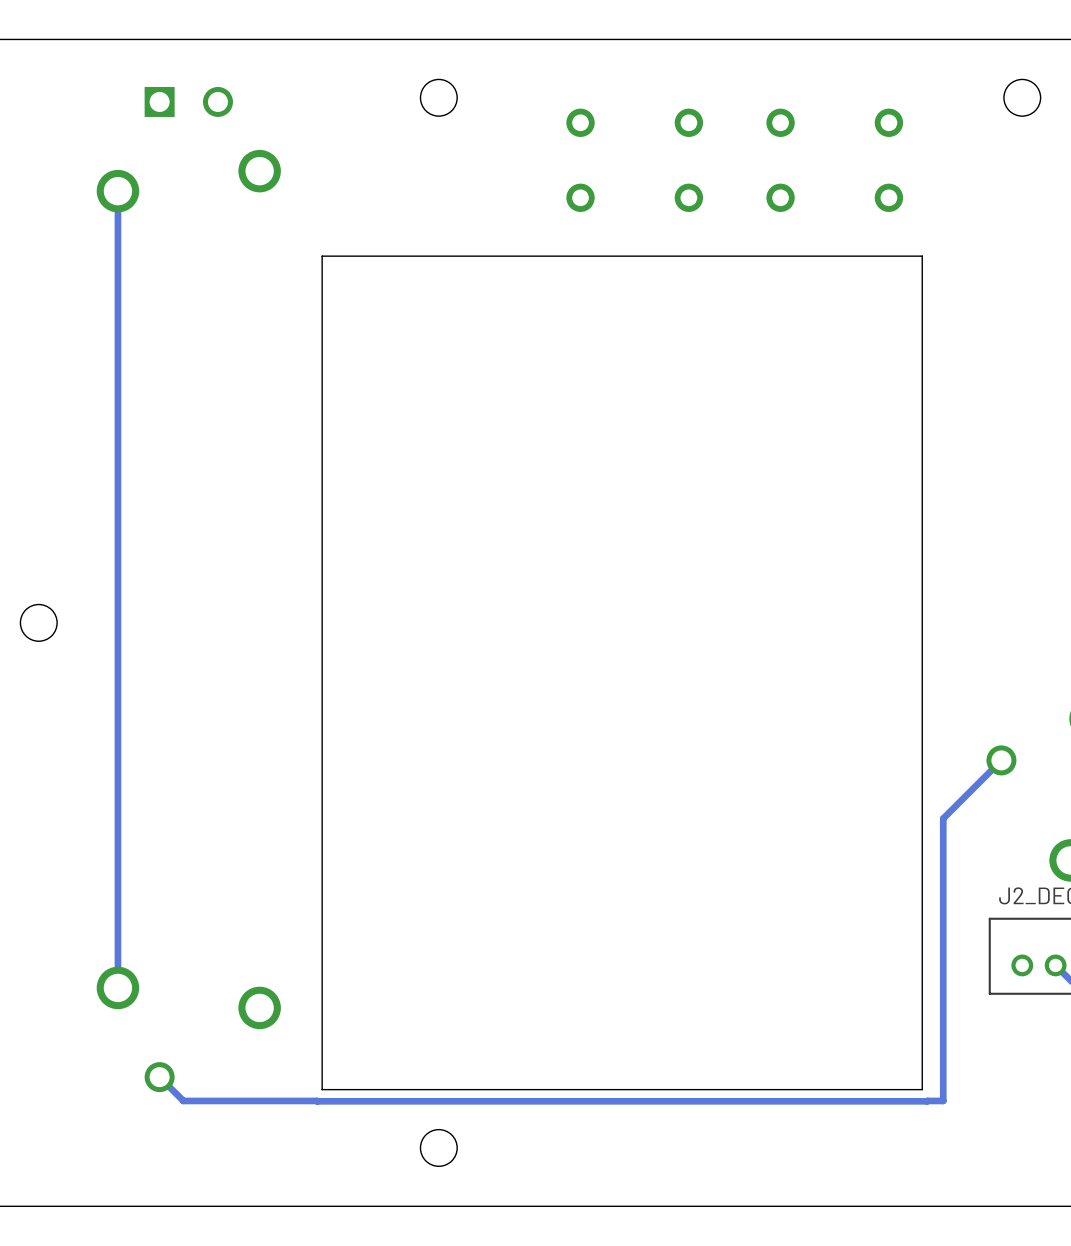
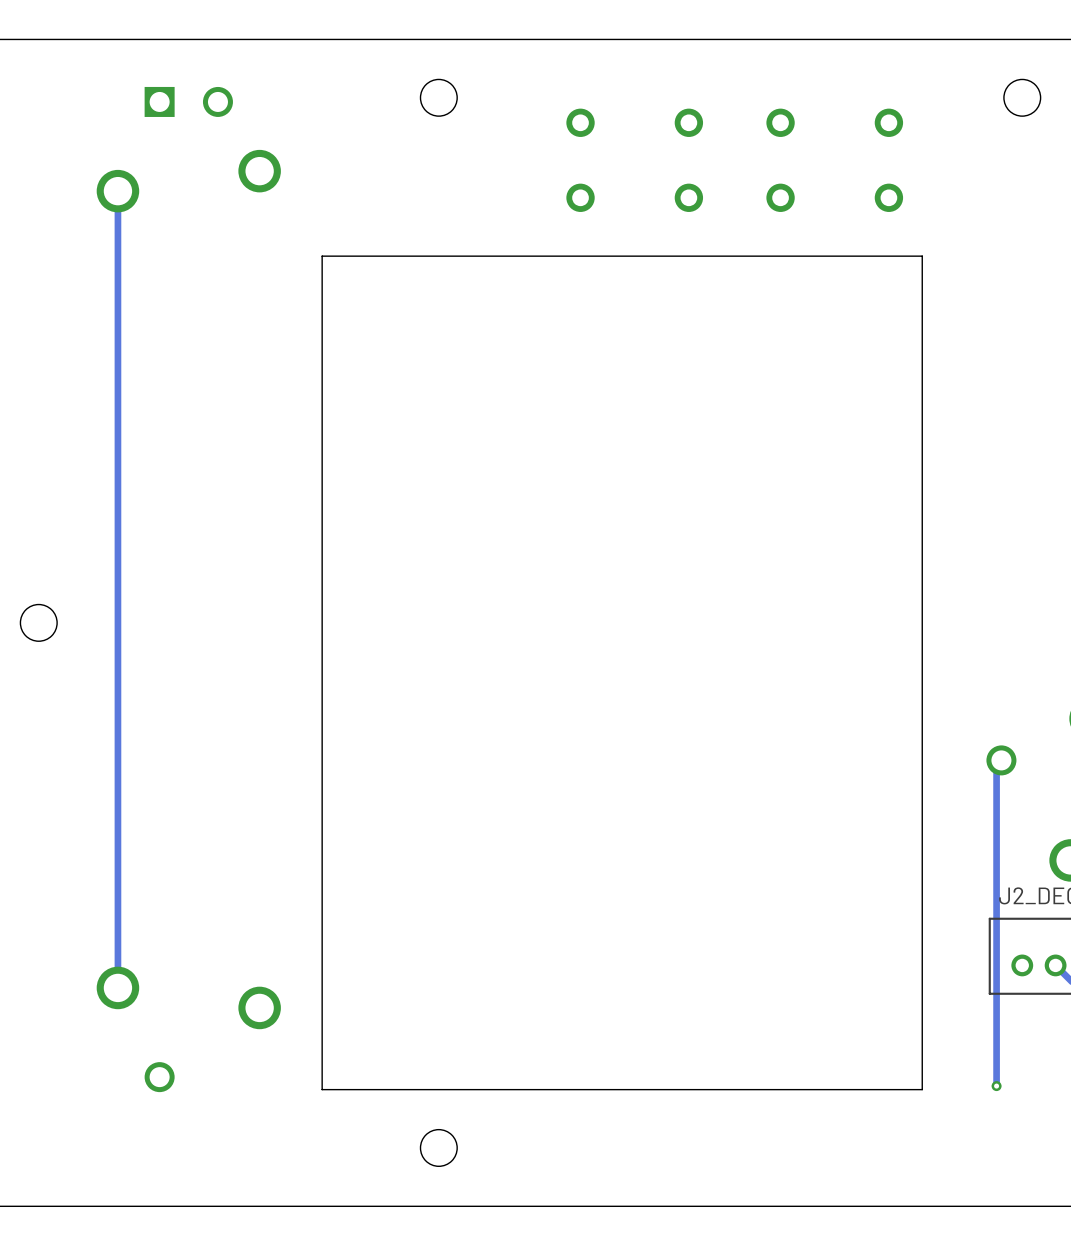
track: (996, 765) (943, 818) (943, 1100) (183, 1100) (159, 1077) -> (996, 765) (996, 1086)
via: none -> (996, 1086)

